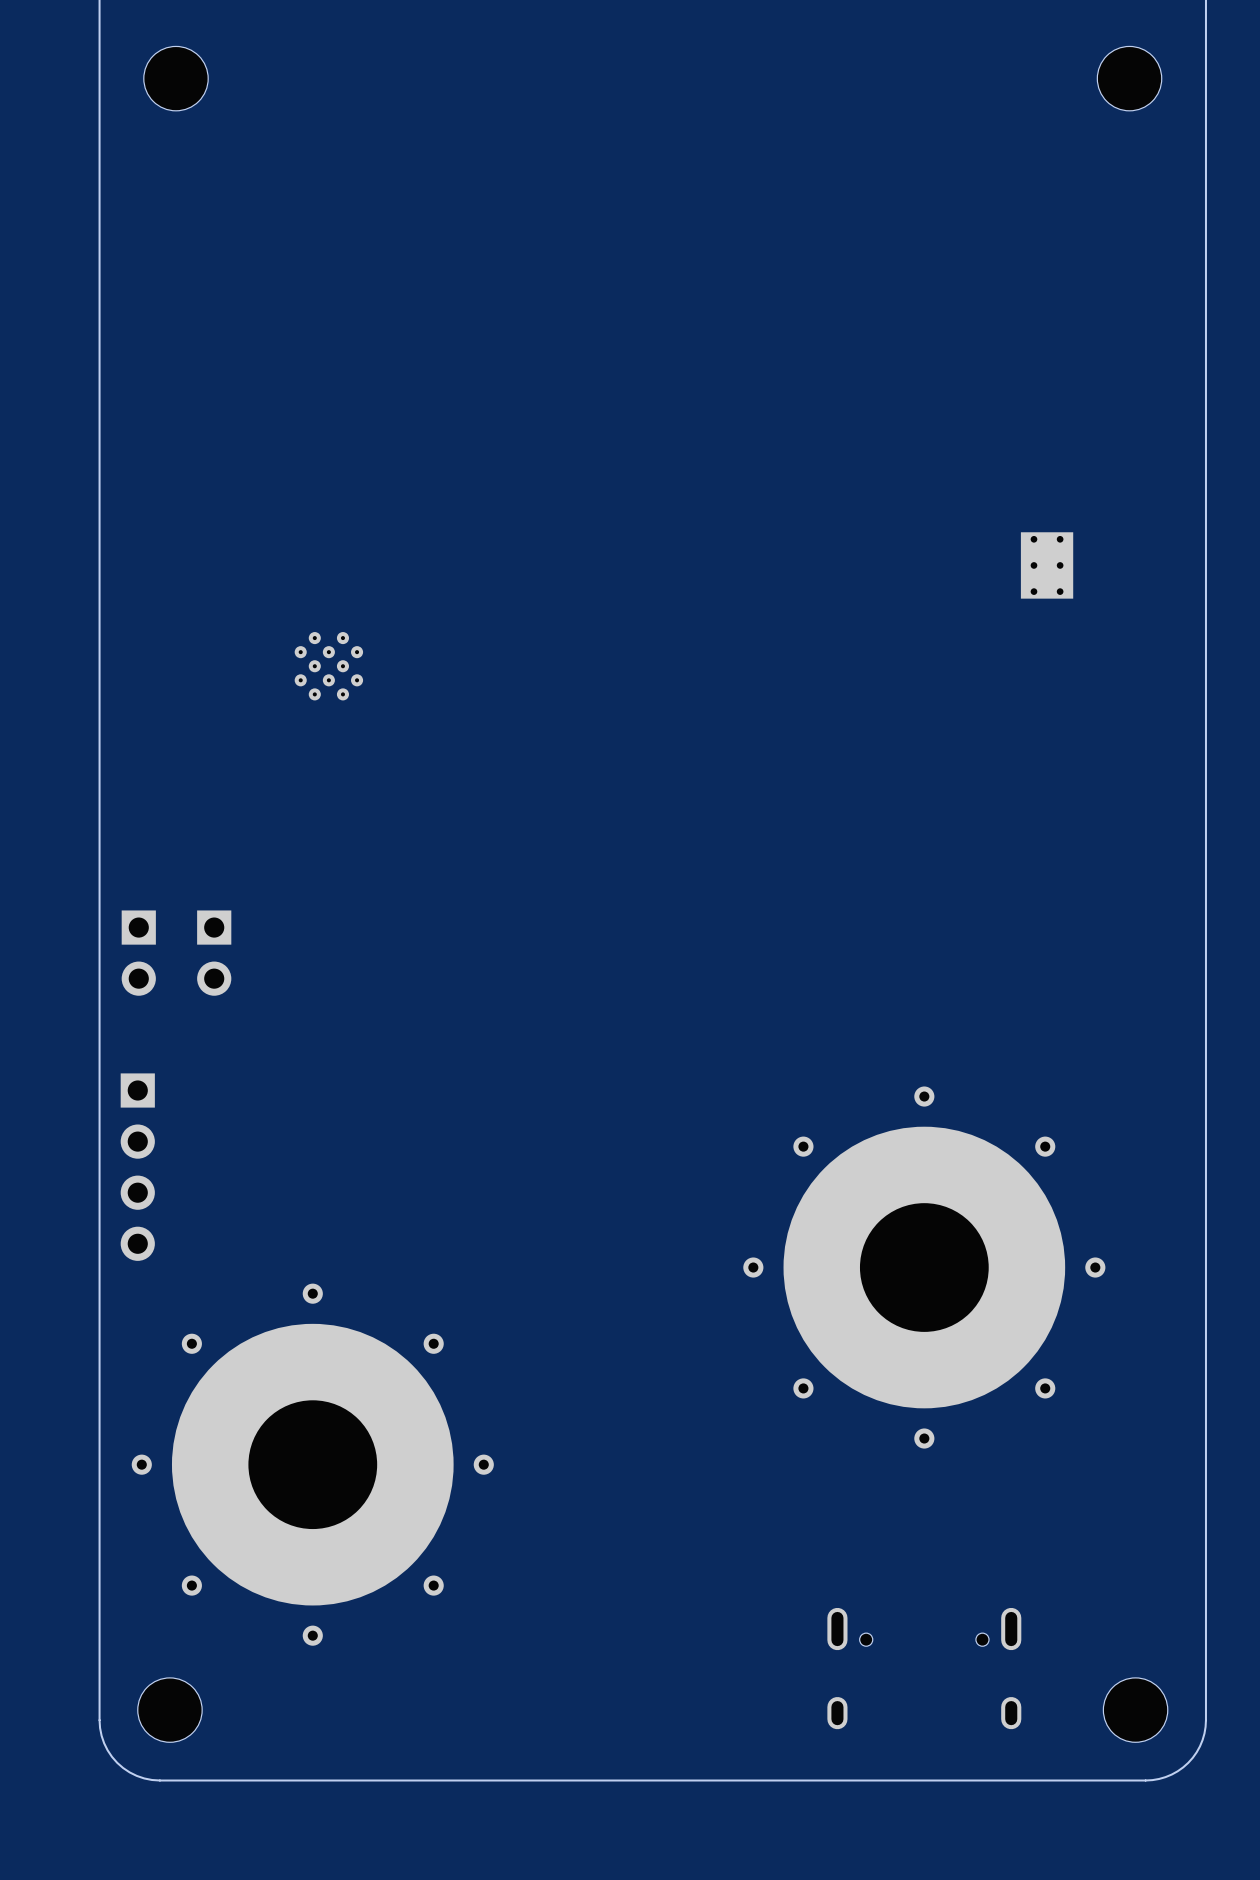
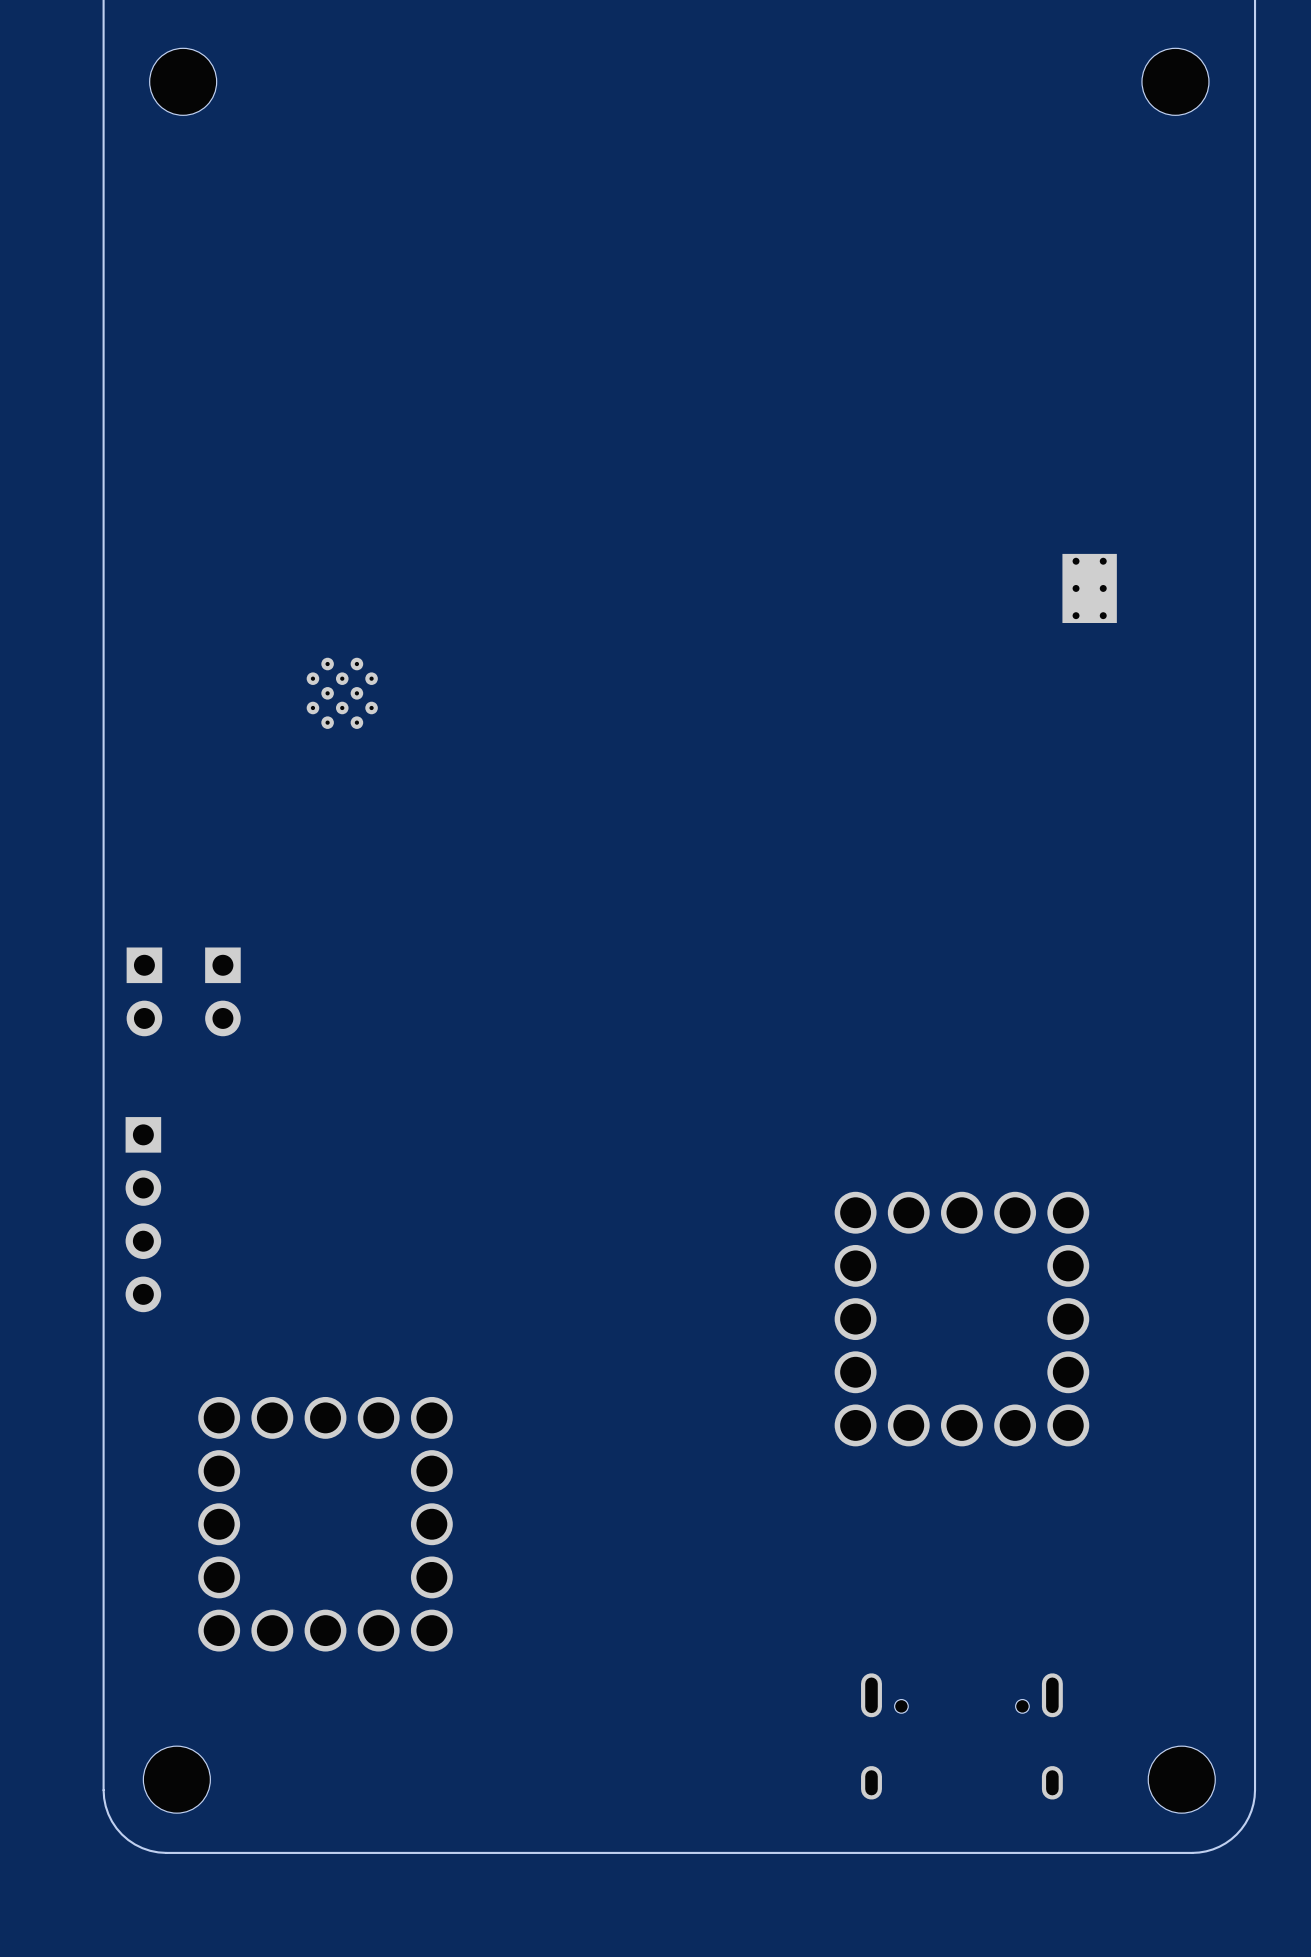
part footprint: [743, 1086, 1106, 1449] -> [834, 1191, 1090, 1447]
part footprint: [131, 1283, 494, 1646] -> [198, 1396, 453, 1652]

